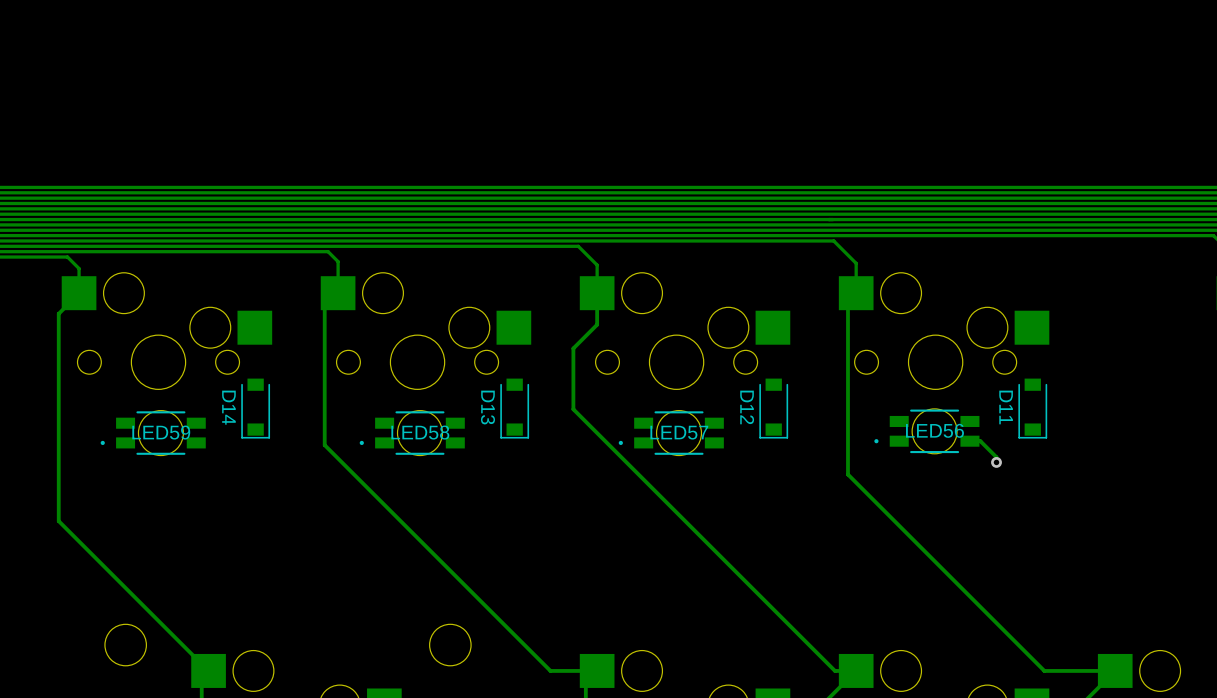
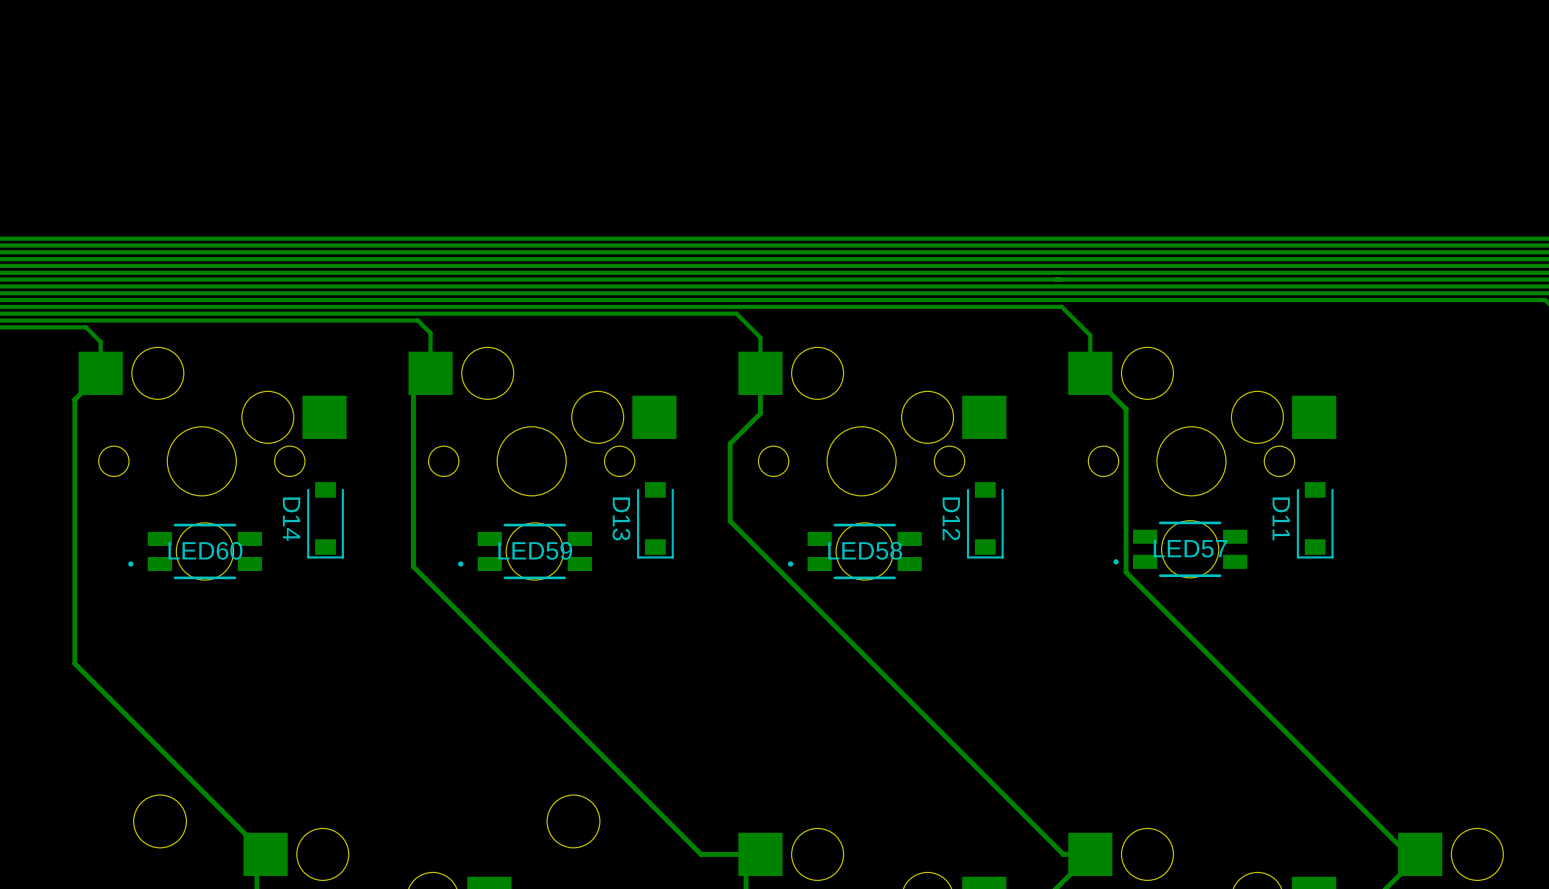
track: (856, 293) (847, 301) (847, 474) (1044, 670) (1105, 670) -> (1090, 373) (1126, 409) (1126, 572) (1408, 854)
LED56 name: LED56 (934, 430) -> LED57 (1190, 548)
LED59 name: LED59 (161, 432) -> LED60 (205, 550)
LED58 name: LED58 (420, 432) -> LED59 (535, 550)
LED57 name: LED57 (679, 432) -> LED58 (865, 550)
track: (969, 441) (980, 441) (996, 457) (996, 462) -> none
via: (996, 462) -> none

